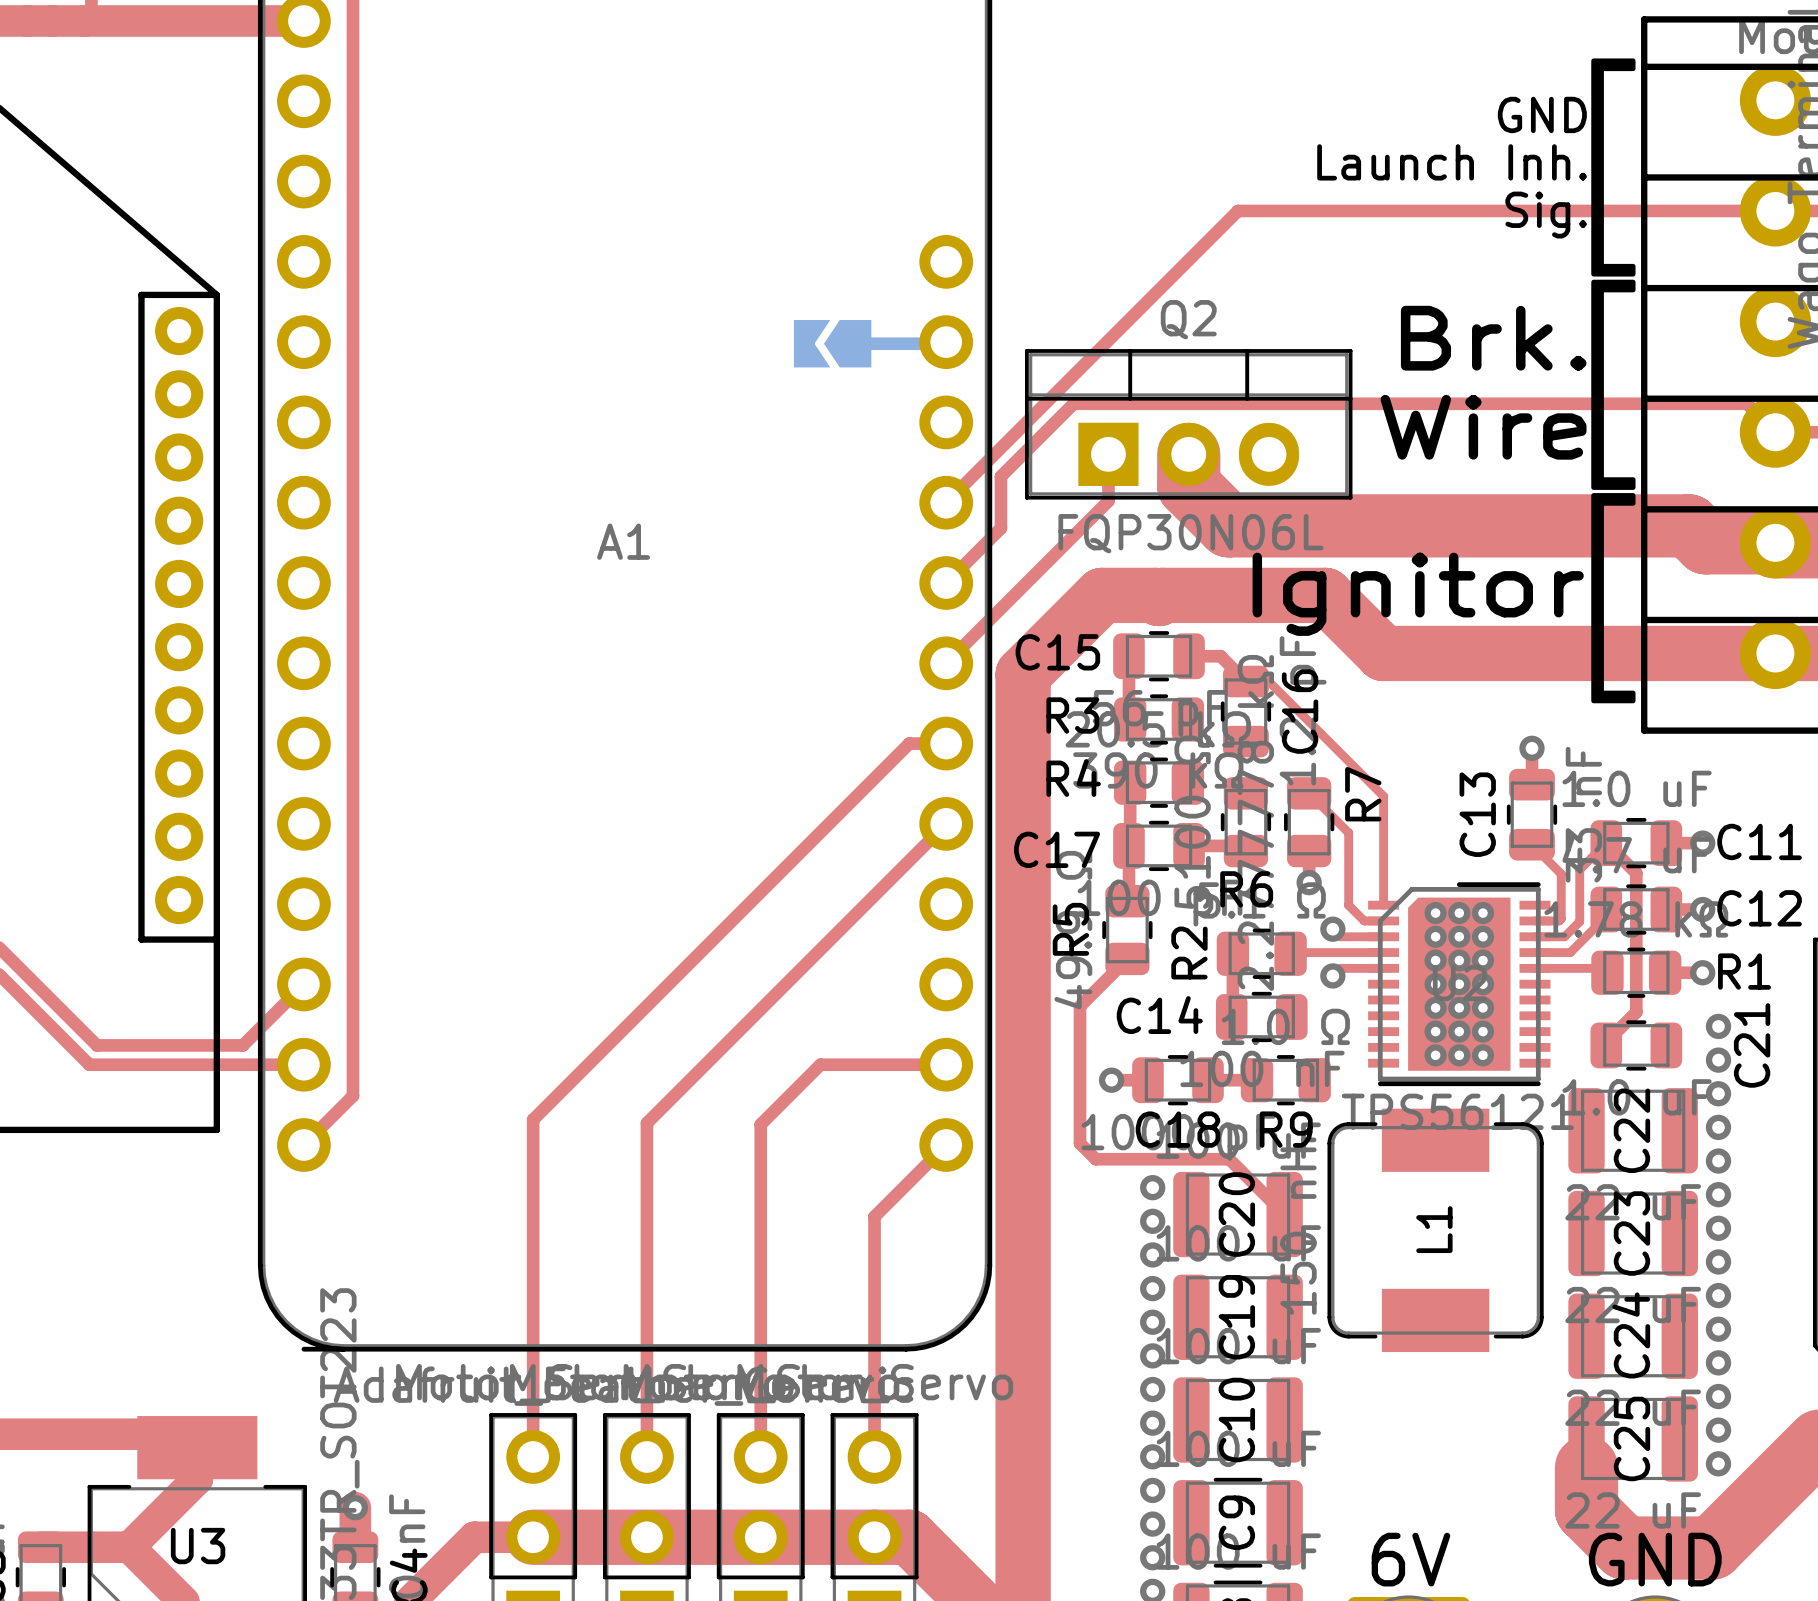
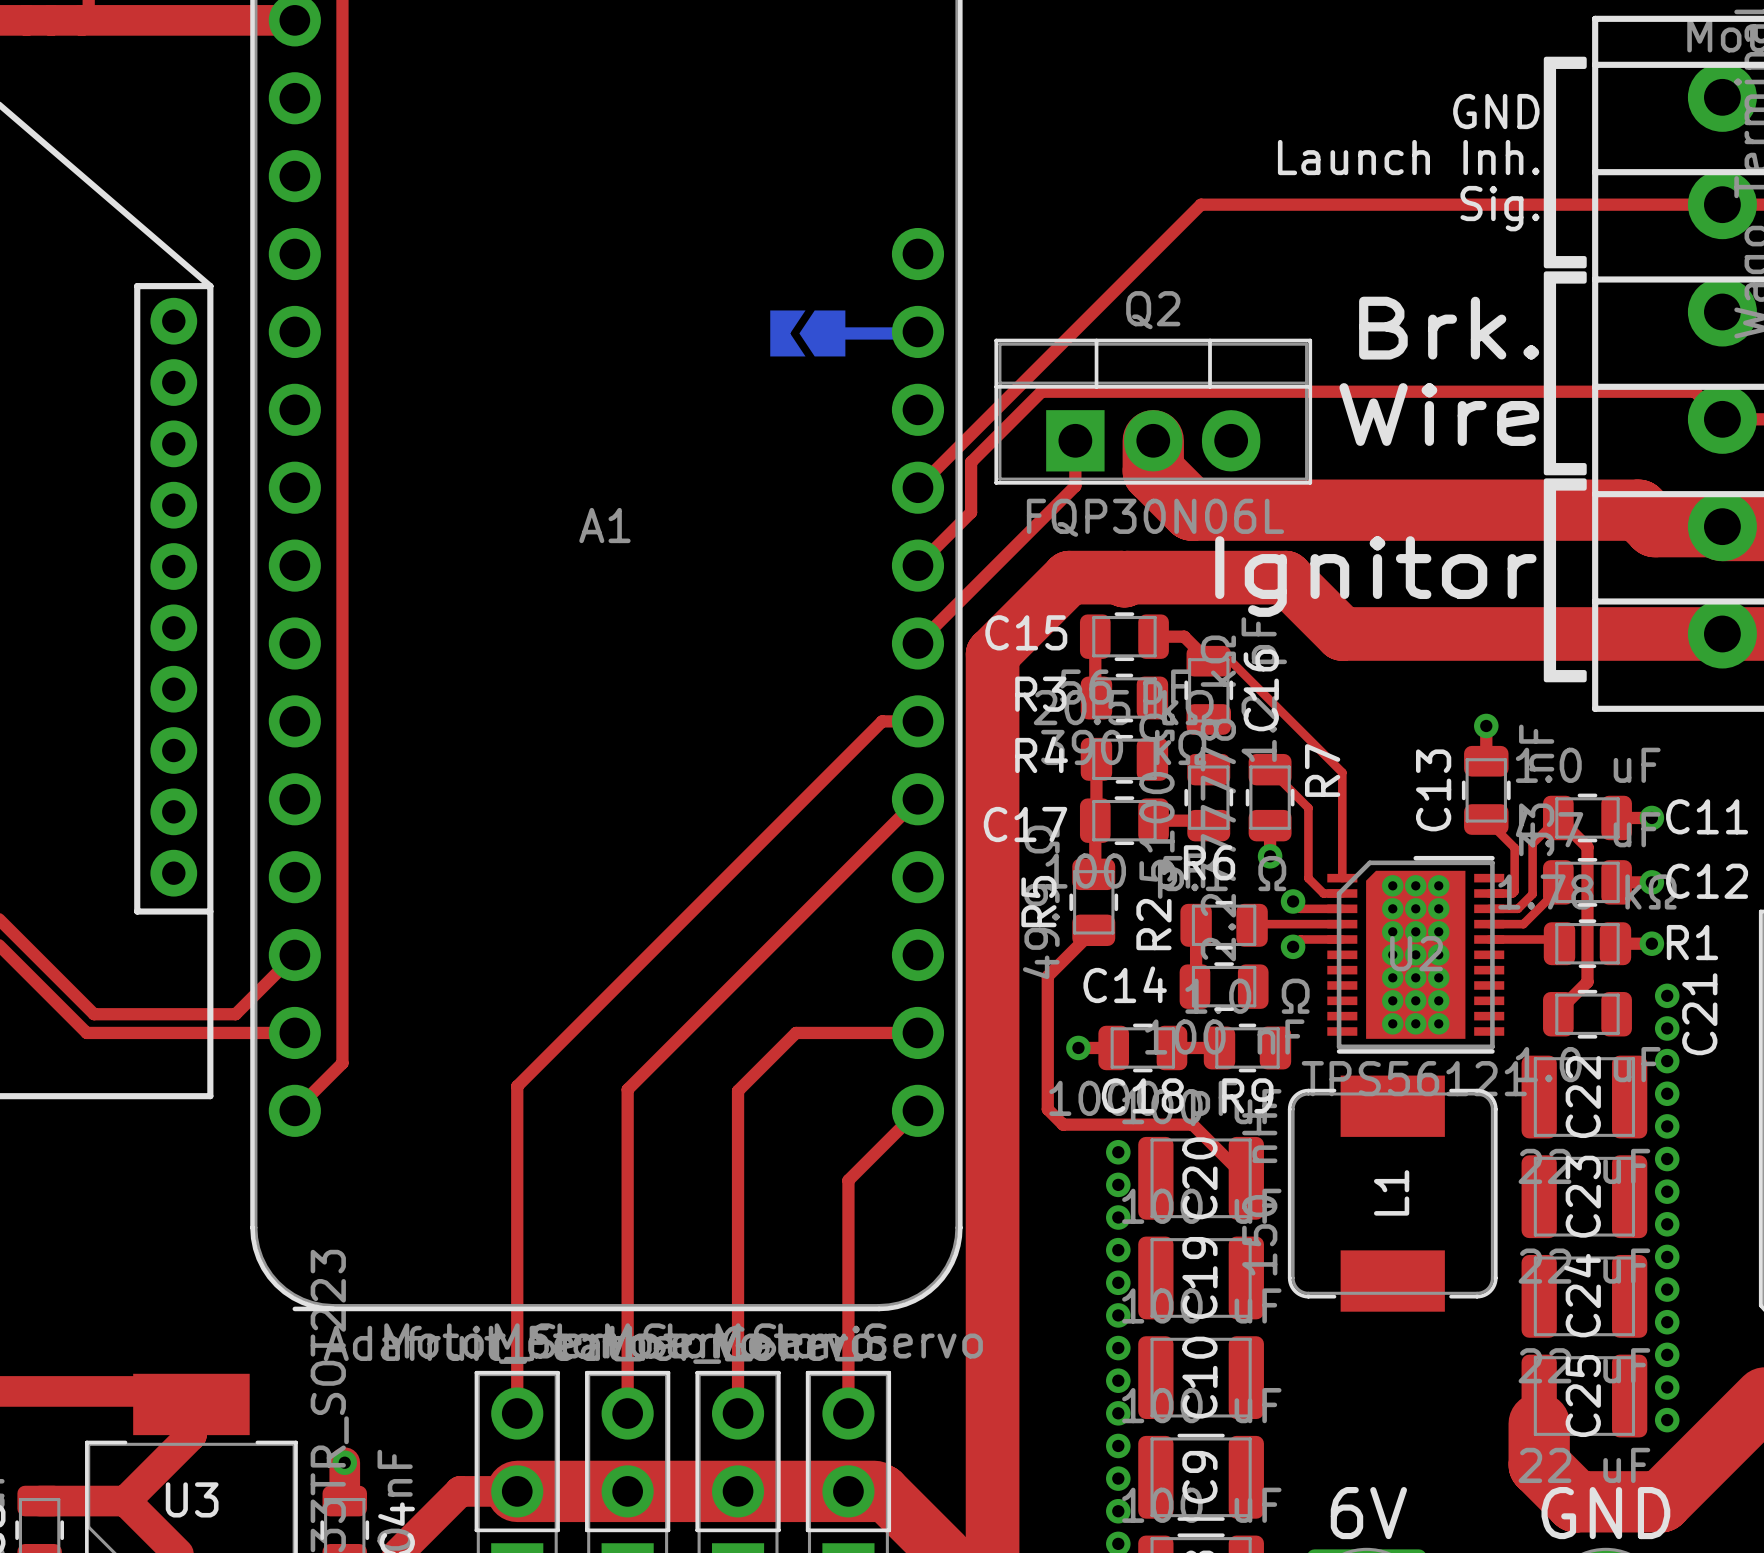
top track width: thin (533, 1537) (901, 1537) -> thick (517, 1491) (874, 1491)

